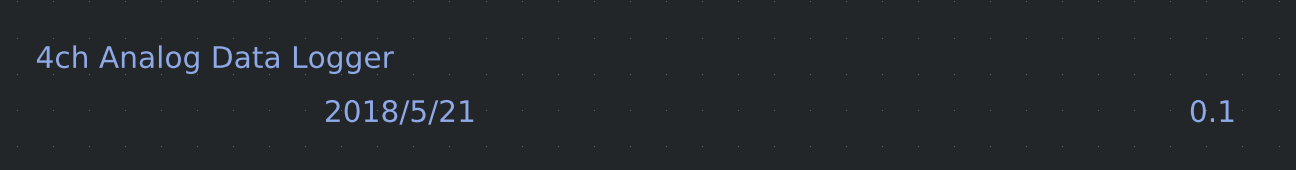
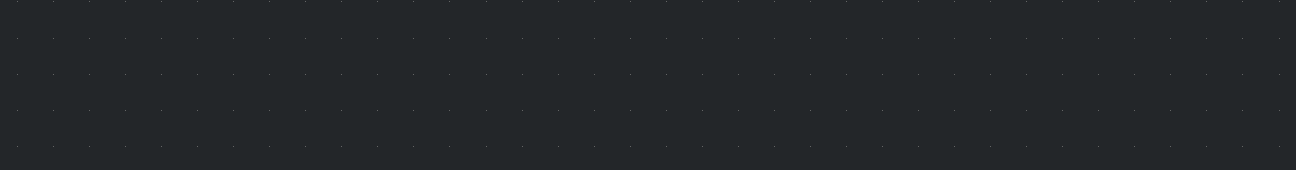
text: 4ch Analog Data Logger (215, 59) -> none
text: 0.1 (1212, 111) -> none
text: 2018/5/21 (399, 112) -> none

